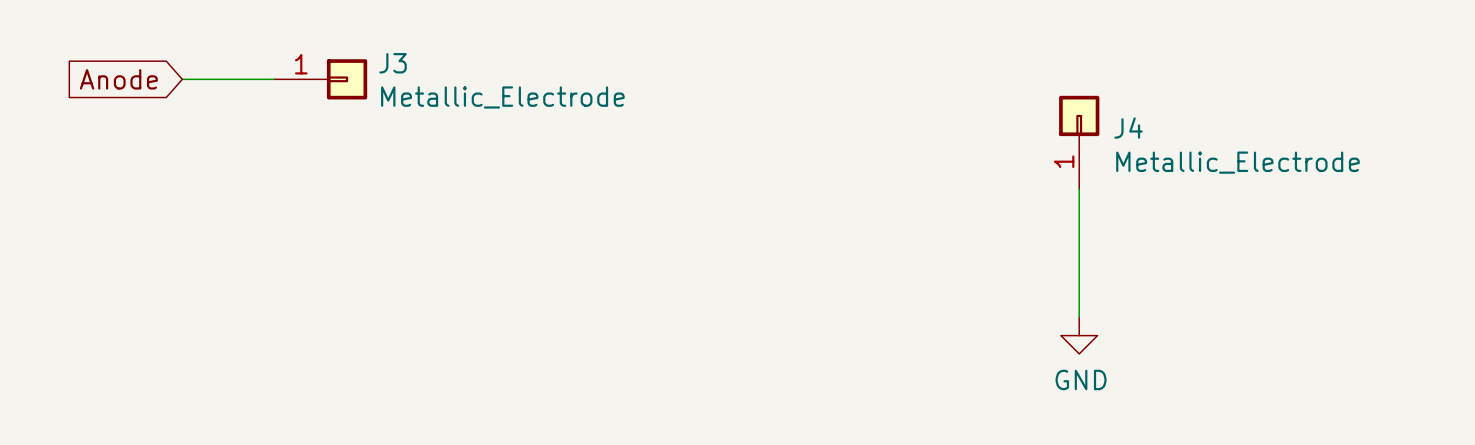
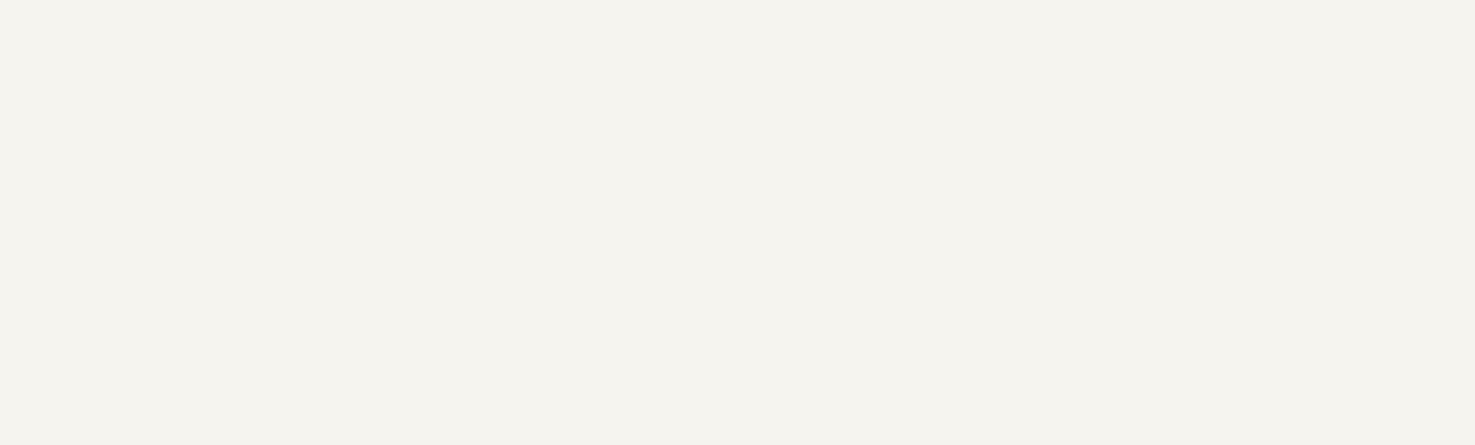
global label: Anode (118, 79) -> none
wire: (182, 79) (273, 79) -> none
J3: Metallic_Electrode (320, 79) -> none
J4: Metallic_Electrode (1079, 142) -> none
wire: (1079, 189) (1079, 317) -> none
power symbol: GND (1079, 335) -> none

